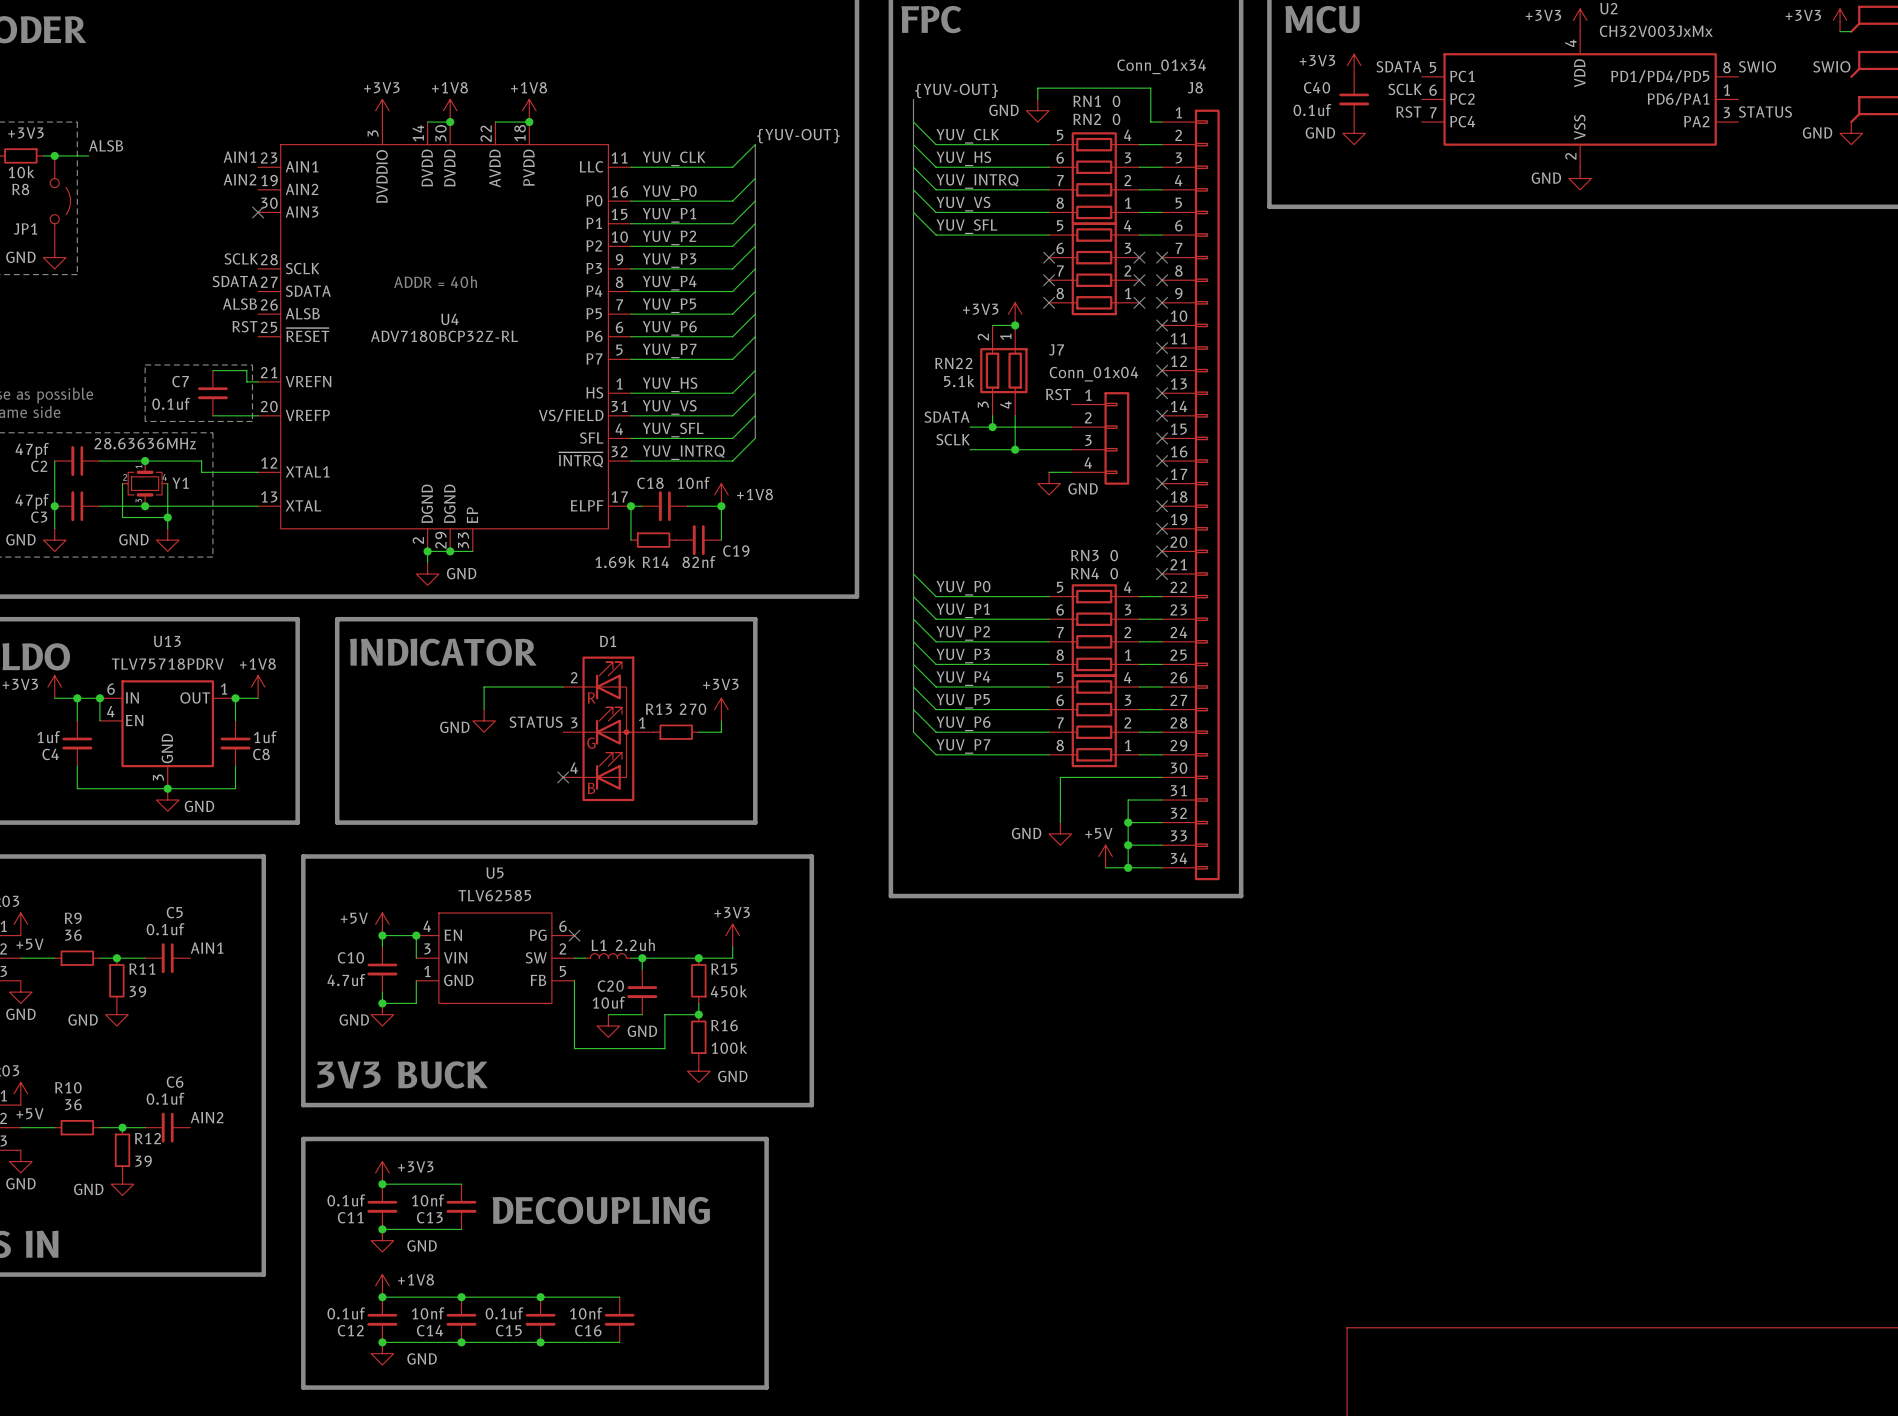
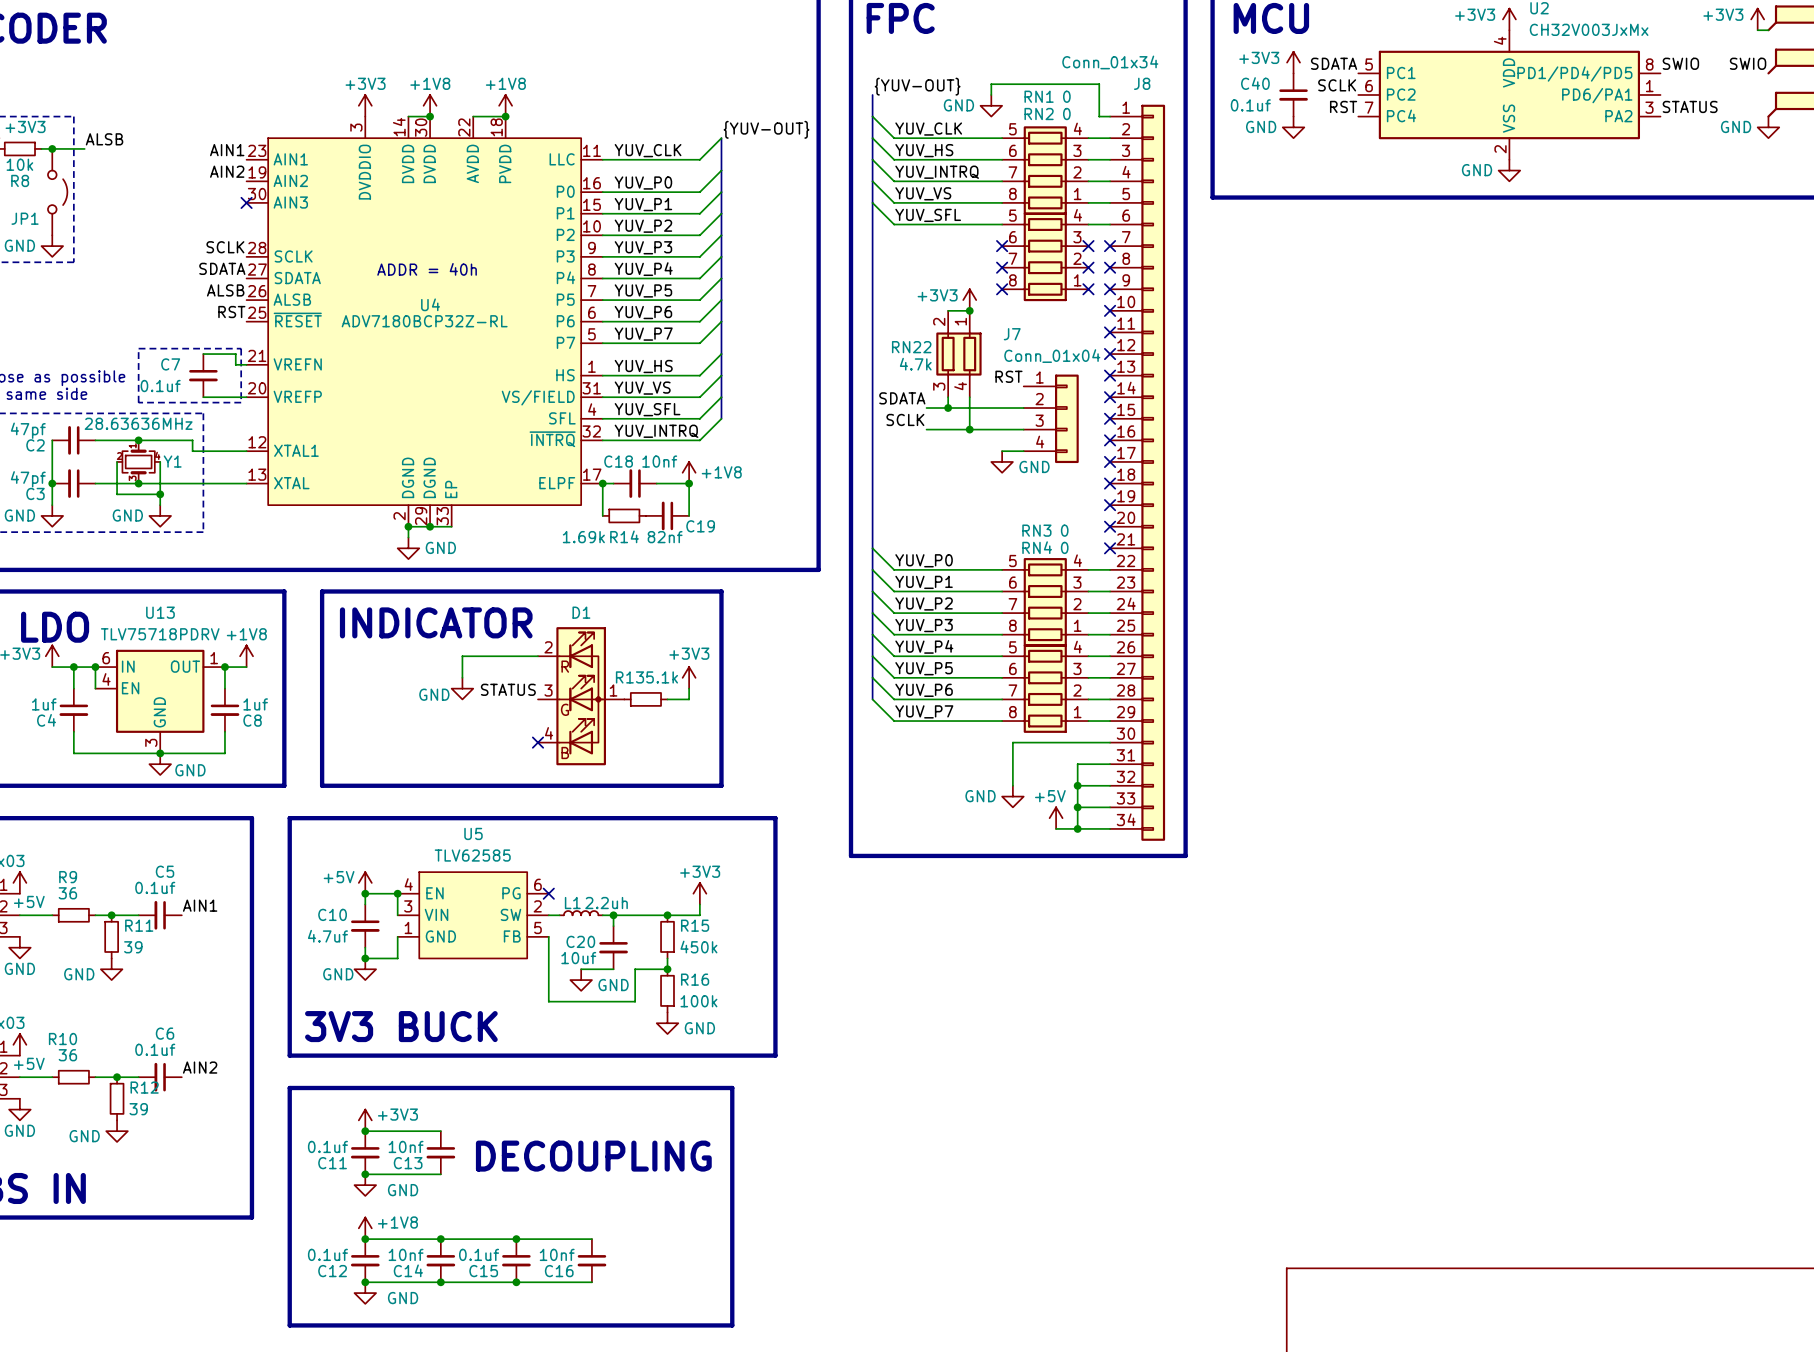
RN22 value: 5.1k (959, 381) -> 4.7k (915, 364)
R13 value: 270 (693, 709) -> 5.1k (662, 677)

